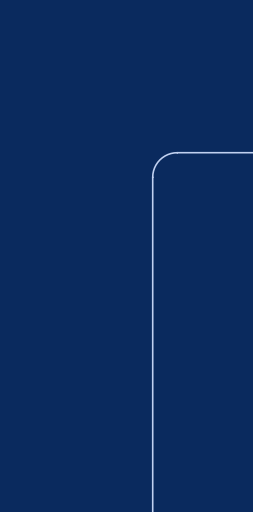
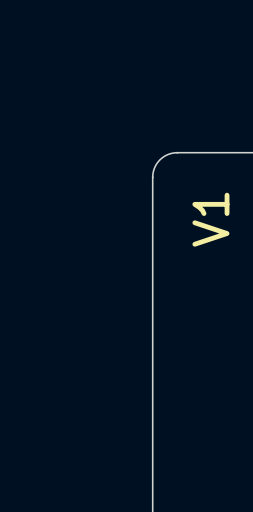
text: none -> V1 (210, 219)

